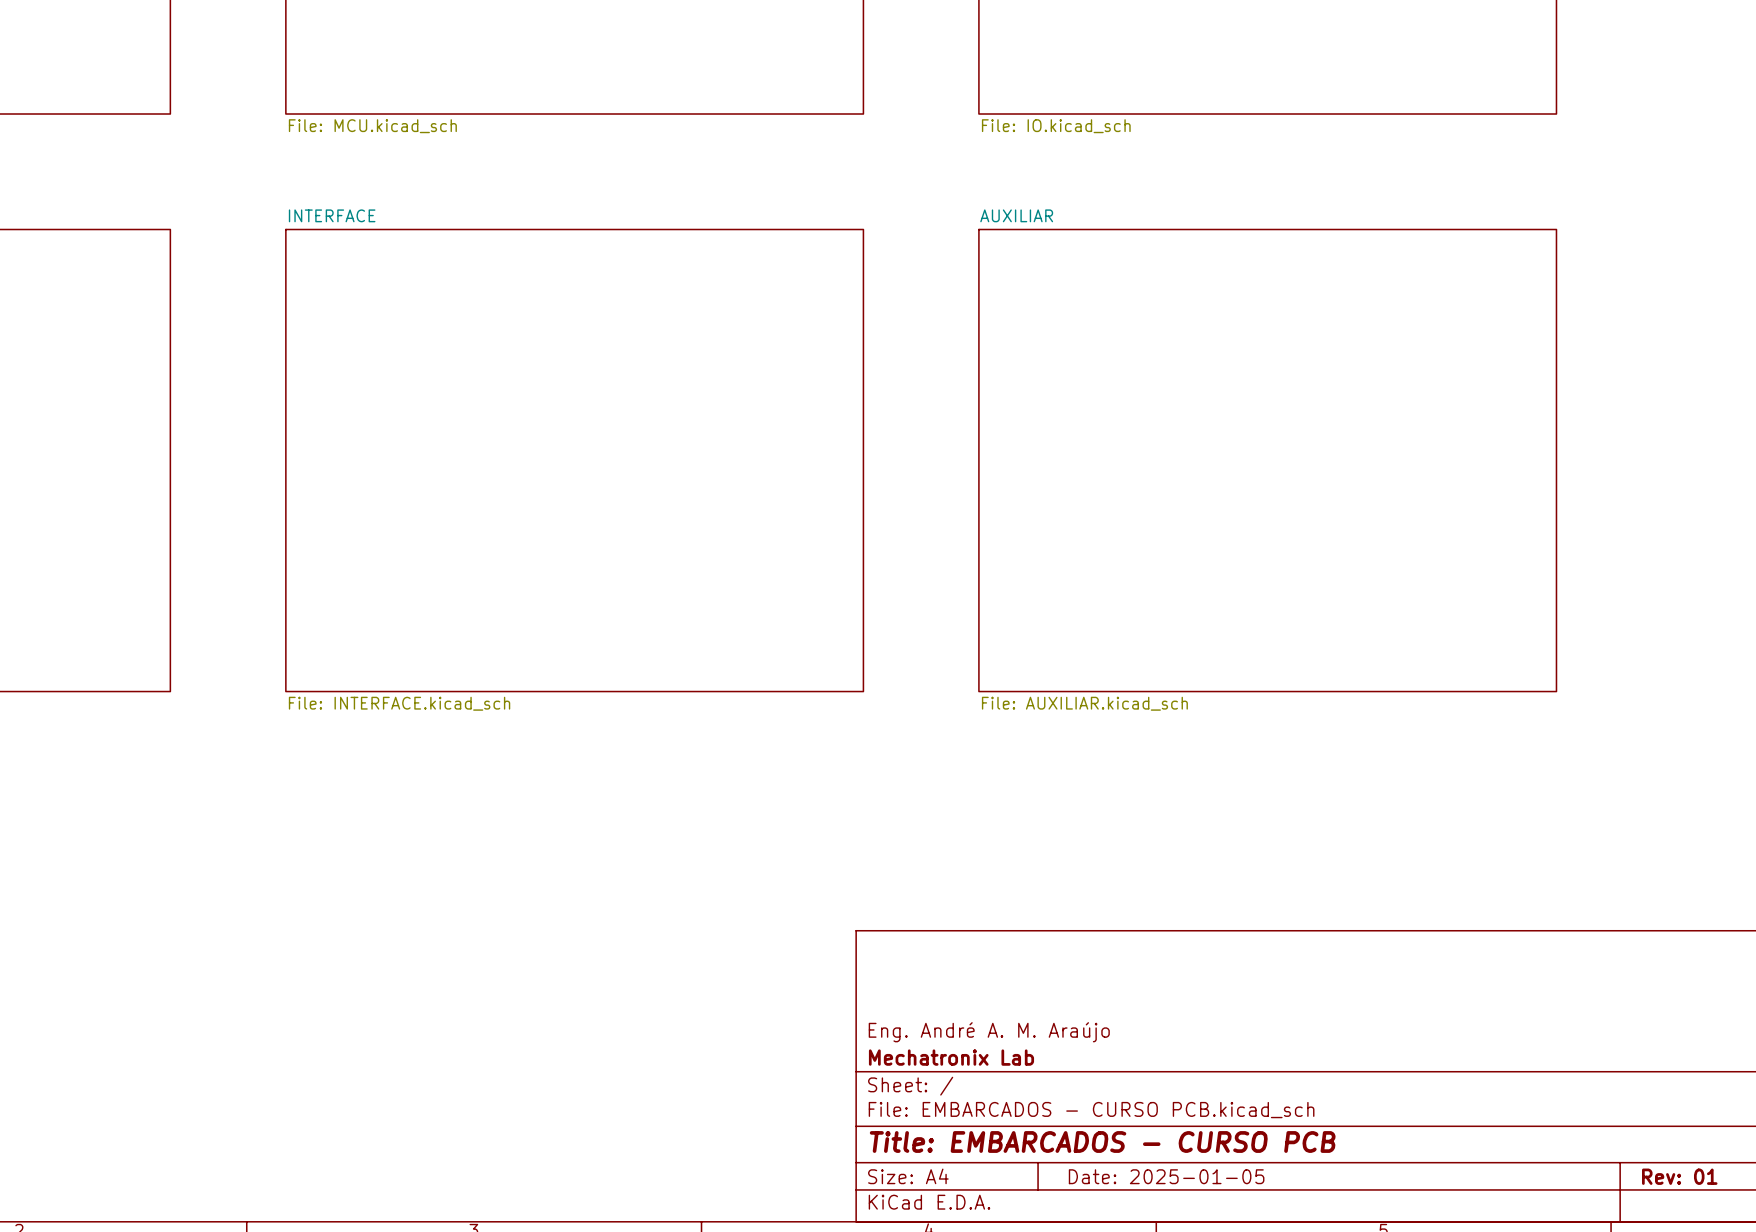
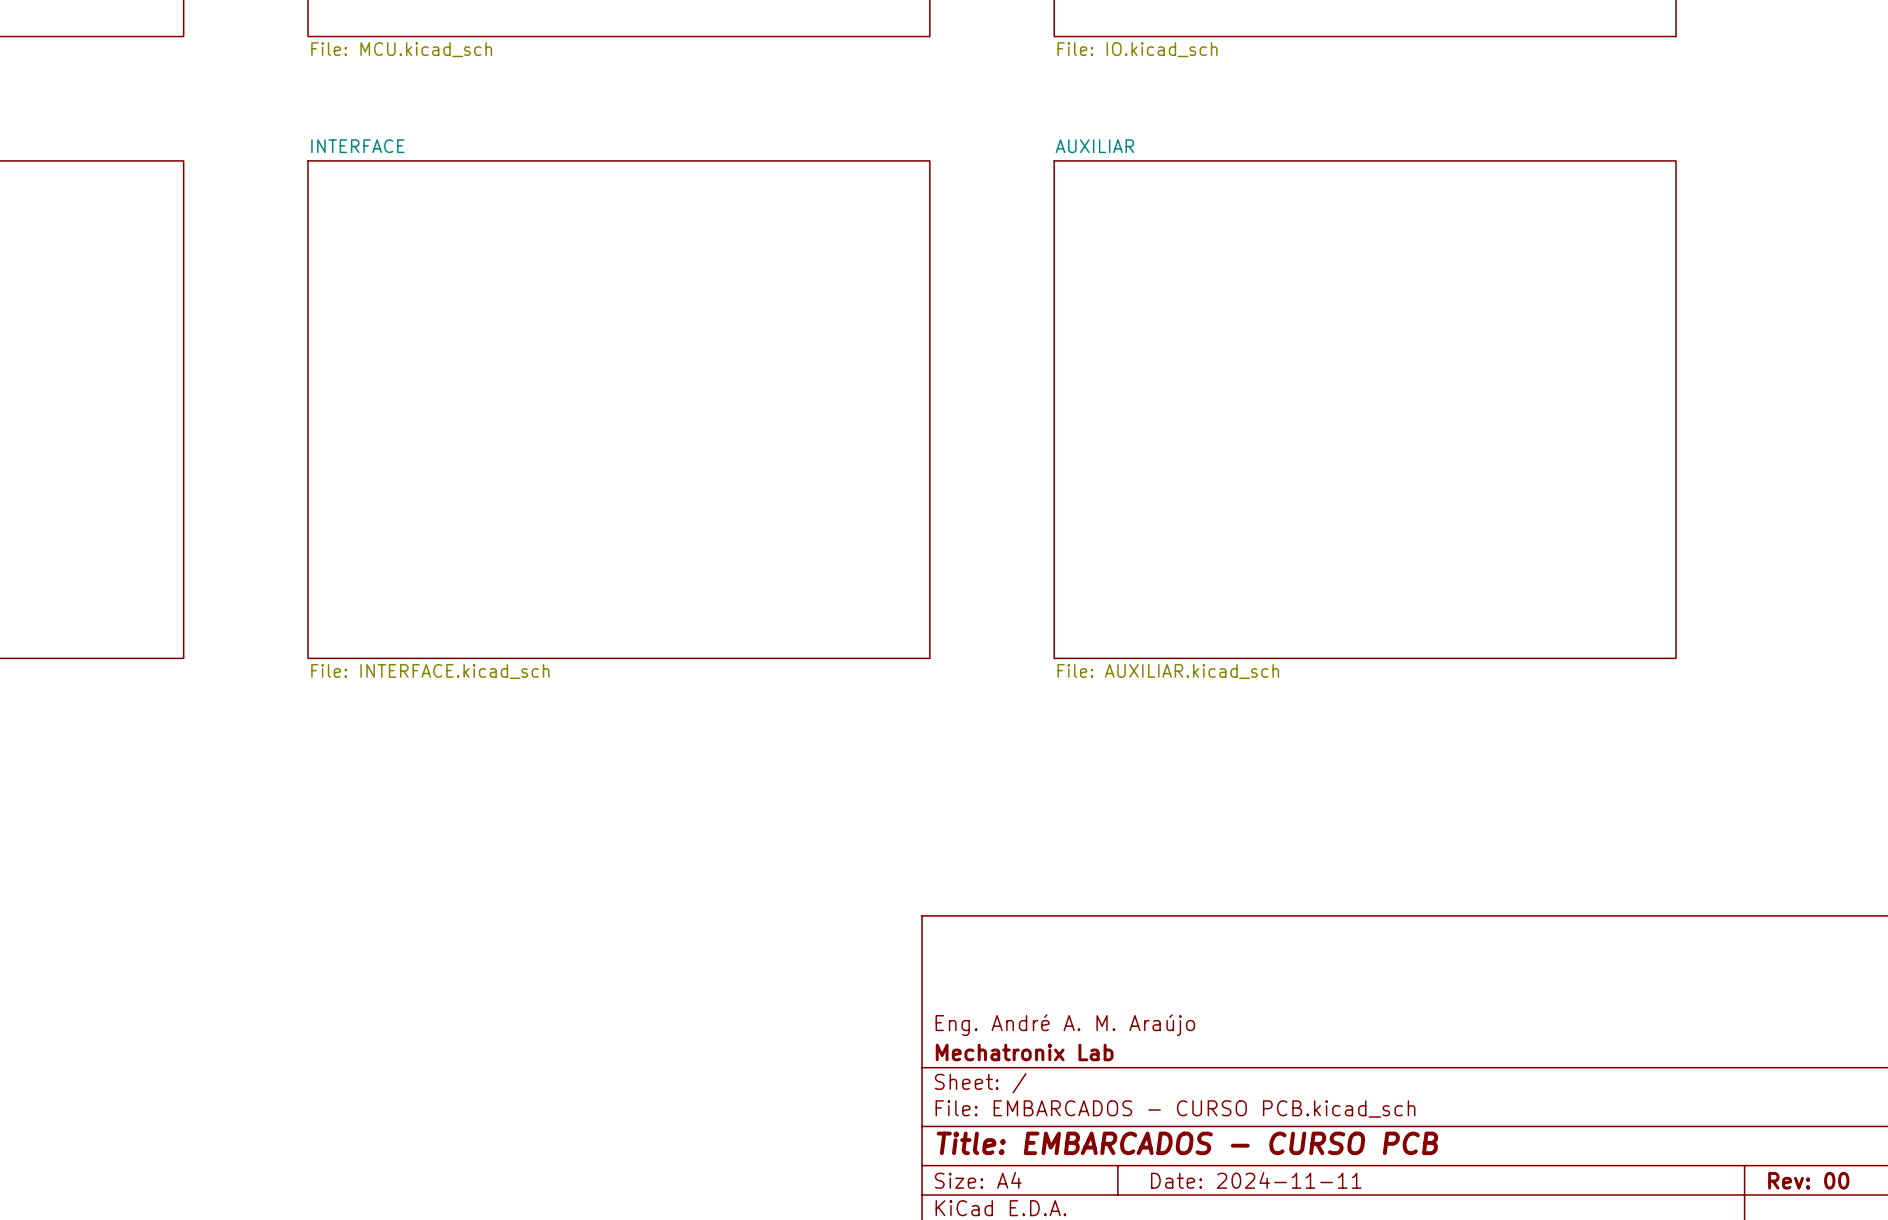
title block: Date: 2025-01-05 (1166, 1176) -> Date: 2024-11-11 (1256, 1180)
title block: Rev: 01 (1679, 1176) -> Rev: 00 (1808, 1180)

